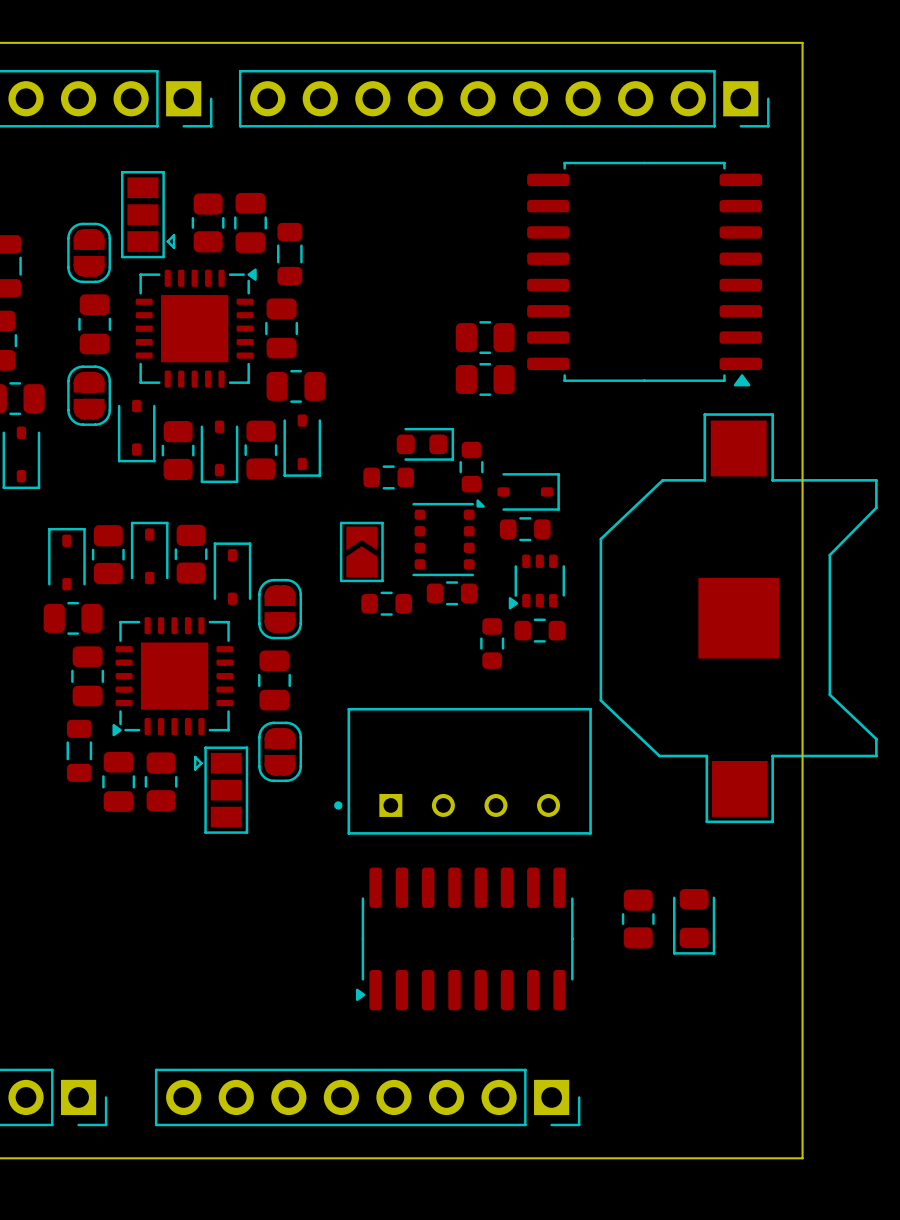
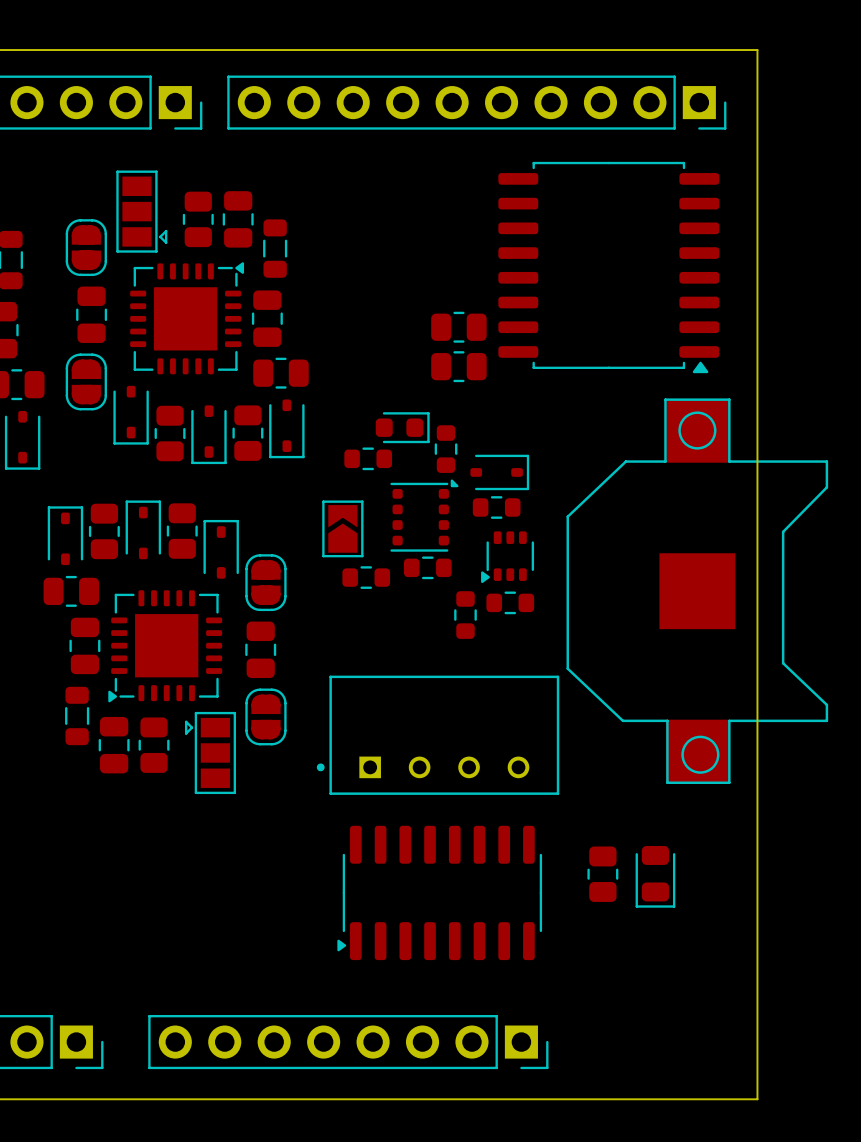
part footprint: [599, 413, 878, 824] -> [566, 398, 829, 784]

